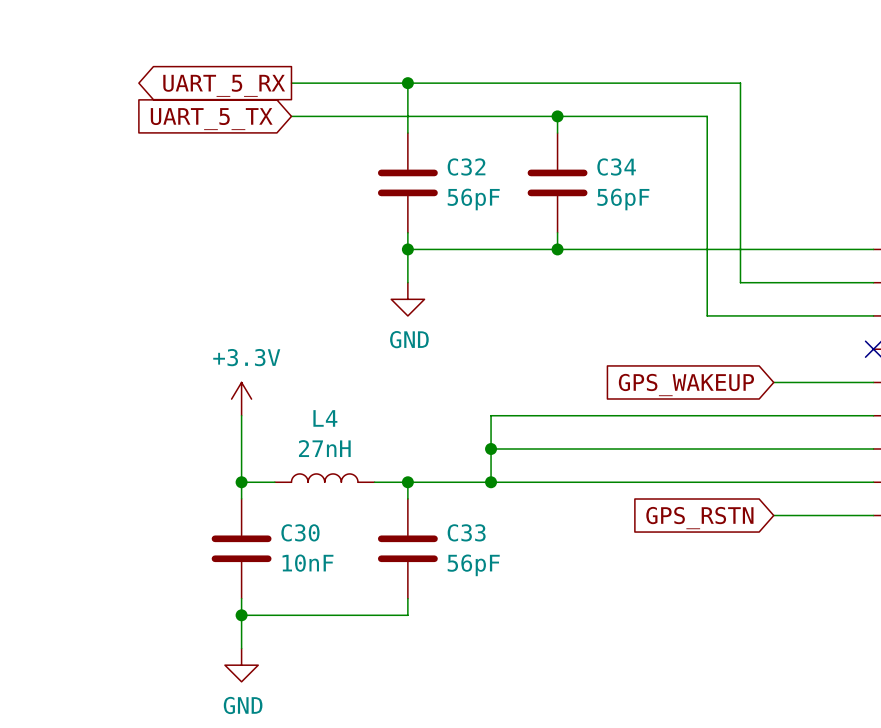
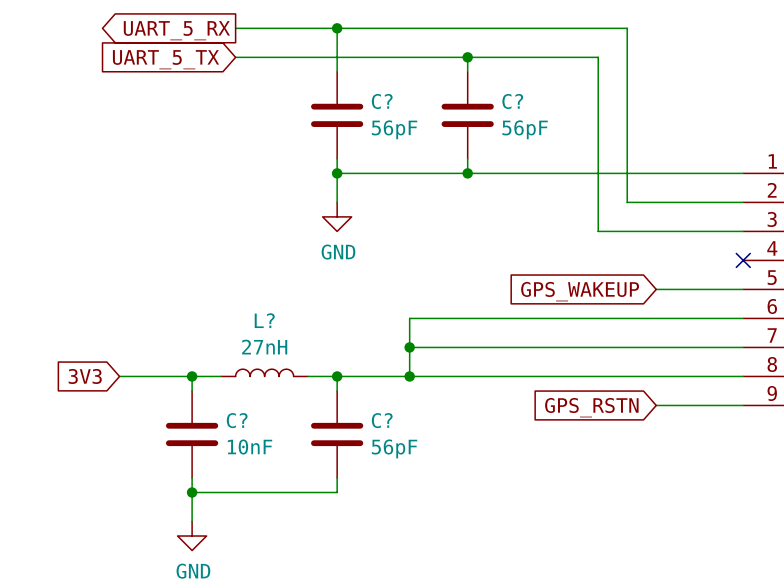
C32 name: C32 (466, 167) -> C? (382, 101)
C34 name: C34 (616, 167) -> C? (512, 101)
power symbol: +3.3V (241, 399) -> none
wire: (241, 415) (241, 482) -> (119, 376) (192, 376)
L4 name: L4 (325, 418) -> L? (264, 320)
global label: none -> 3V3 (85, 376)
C30 name: C30 (300, 532) -> C? (237, 420)
C33 name: C33 (466, 532) -> C? (382, 420)

